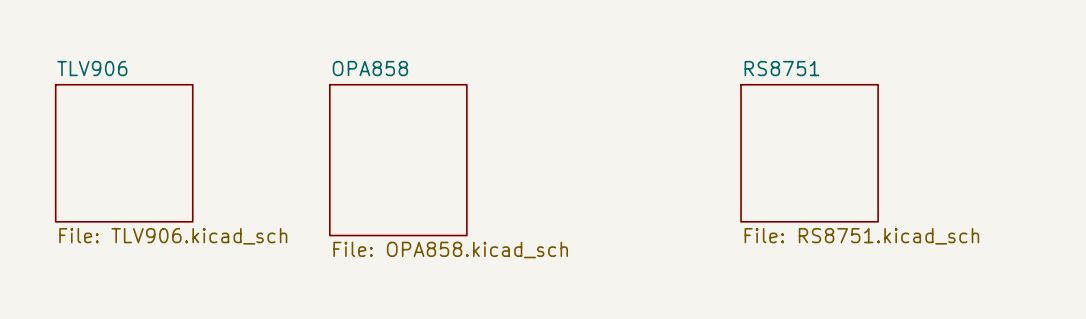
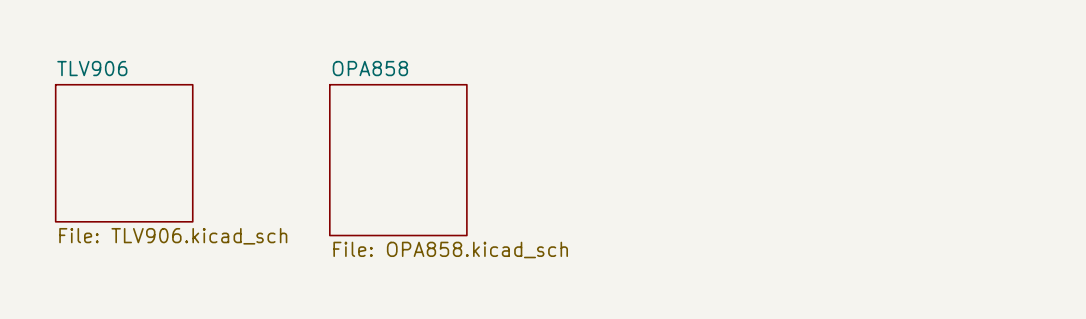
sheet RS8751: File: RS8751.kicad_sch (809, 153) -> none

